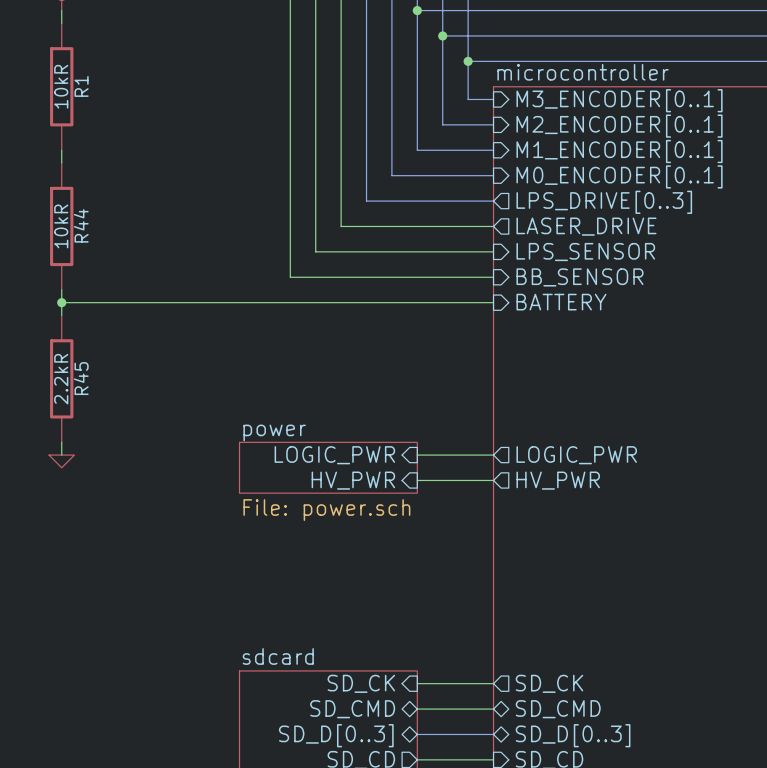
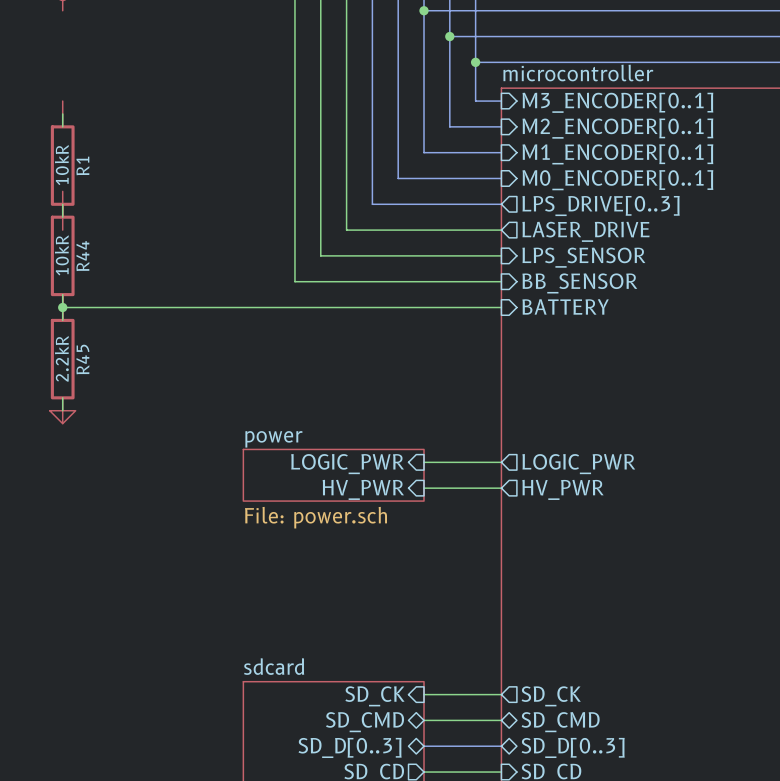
wire: (61, 10) (61, 23) -> (62, 204) (62, 217)
R1 position: (61, 86) -> (62, 165)
wire: (61, 150) (61, 162) -> (62, 113) (62, 126)
R44 position: (61, 226) -> (62, 255)
R45 position: (61, 378) -> (62, 359)
wire: (61, 442) (61, 455) -> (62, 397) (62, 410)
power symbol position: (61, 461) -> (62, 417)

